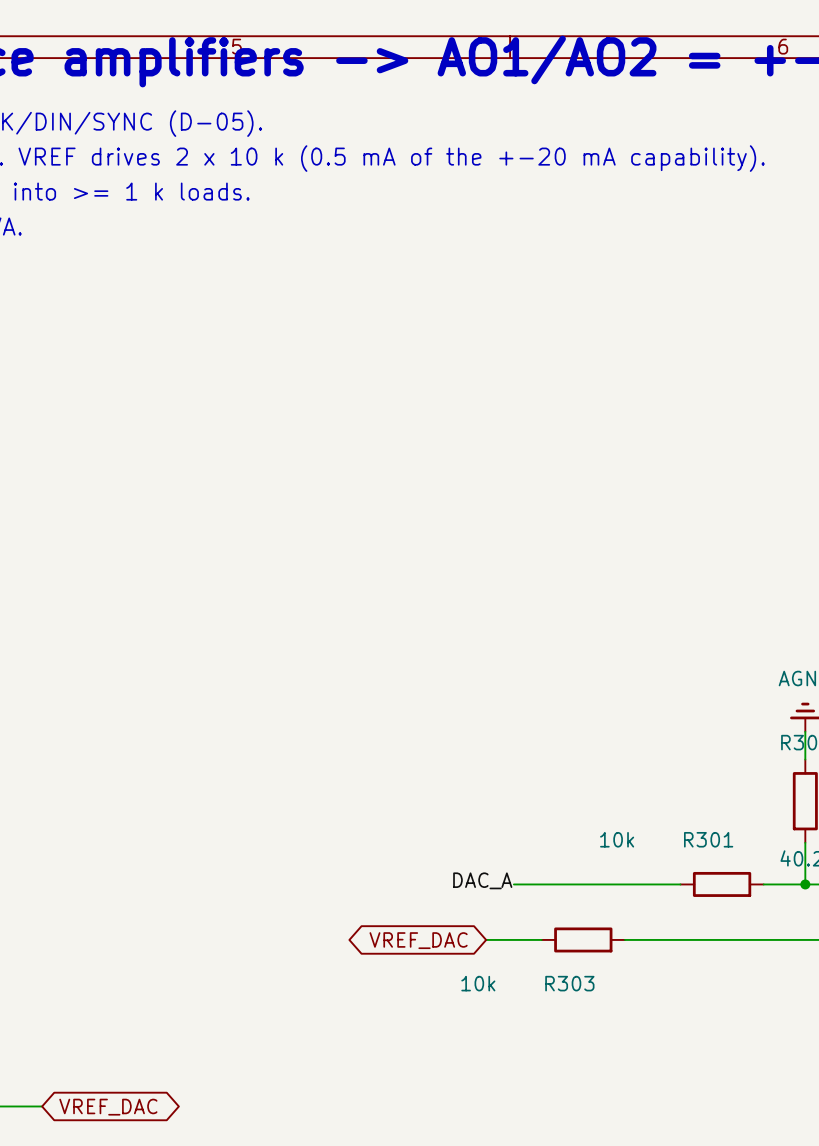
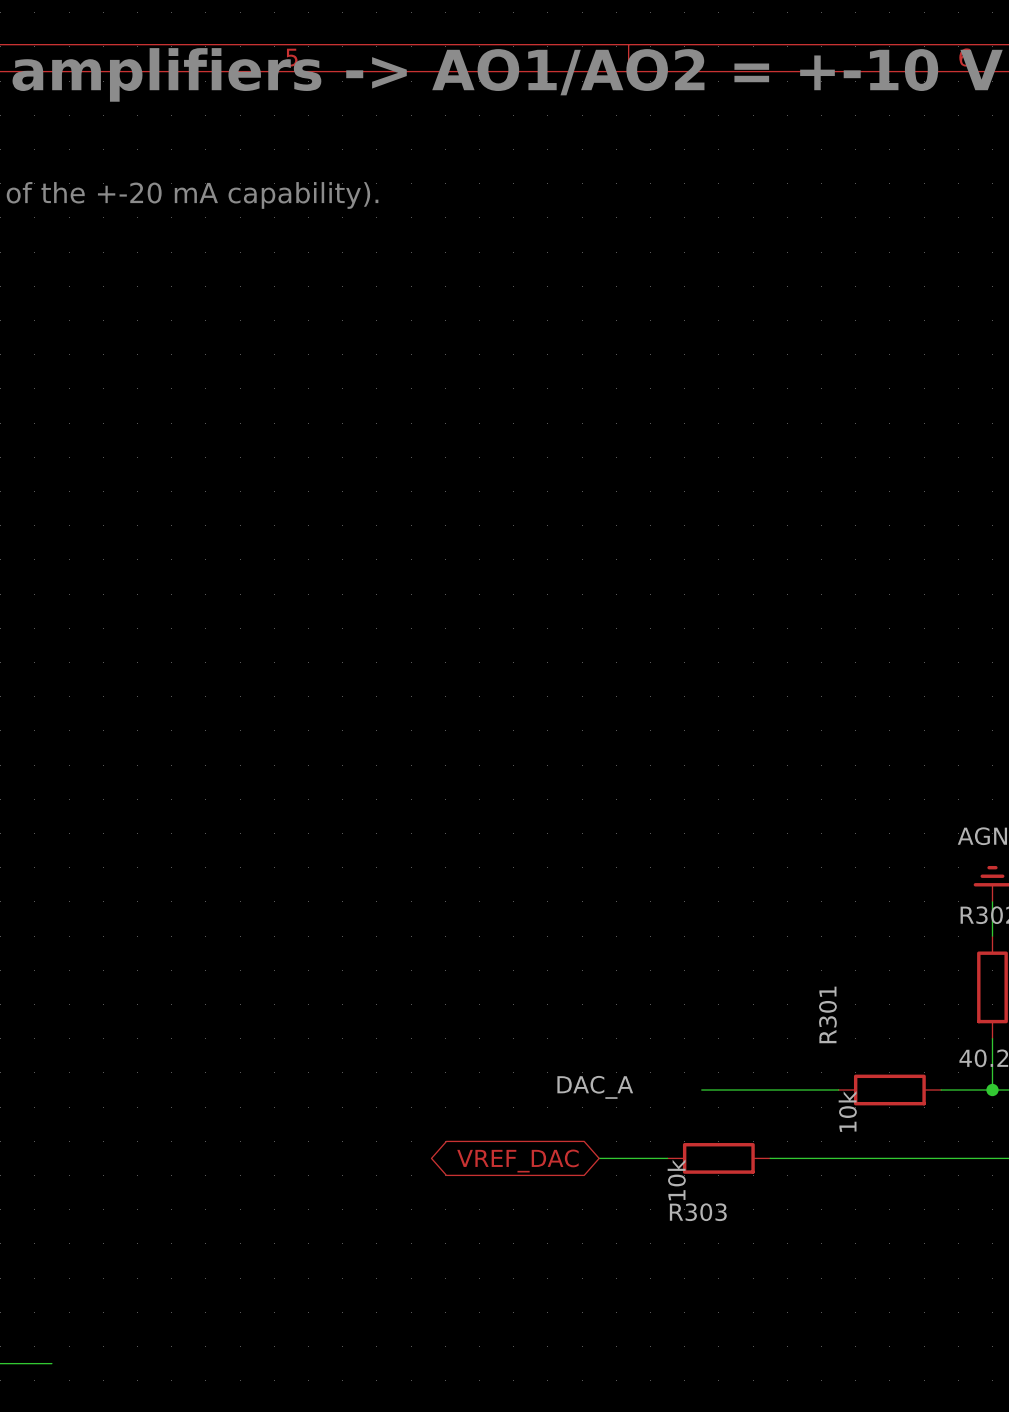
R301 value rotation: 0° (617, 839) -> 90° counterclockwise (847, 1111)
R301 value position: 10k (617, 839) -> 10k (847, 1111)
R301 name rotation: 0° (708, 839) -> 90° counterclockwise (827, 1014)
wire: (513, 884) (569, 884) -> none
R303 value rotation: 0° (478, 983) -> 90° counterclockwise (676, 1179)
R303 value position: 10k (478, 983) -> 10k (676, 1179)
global label: VREF_DAC (108, 1107) -> none

